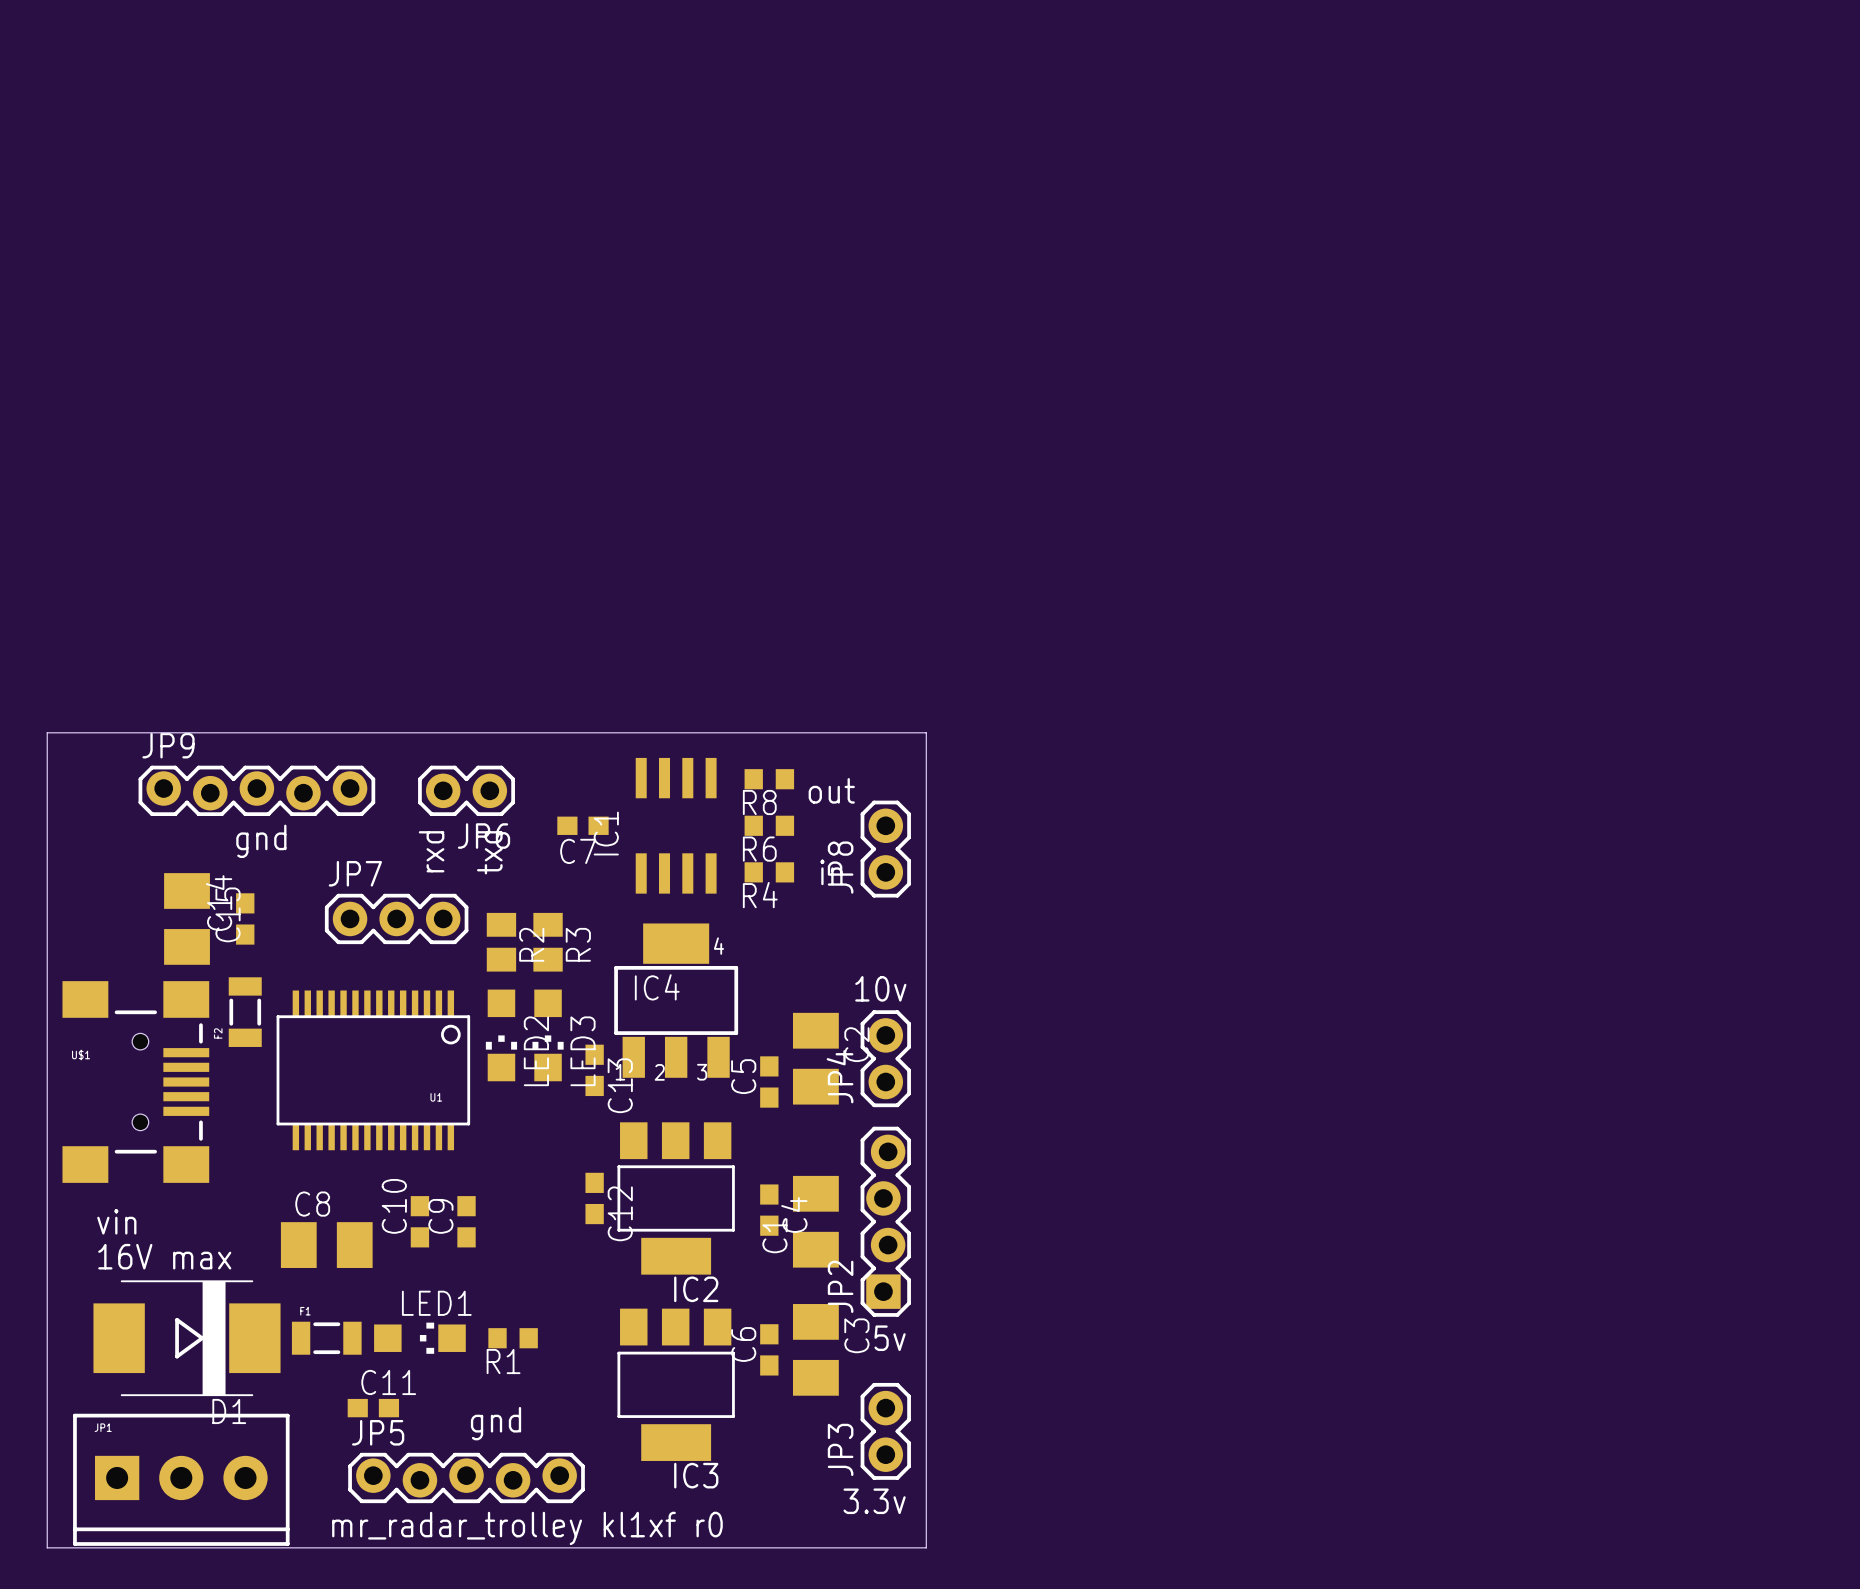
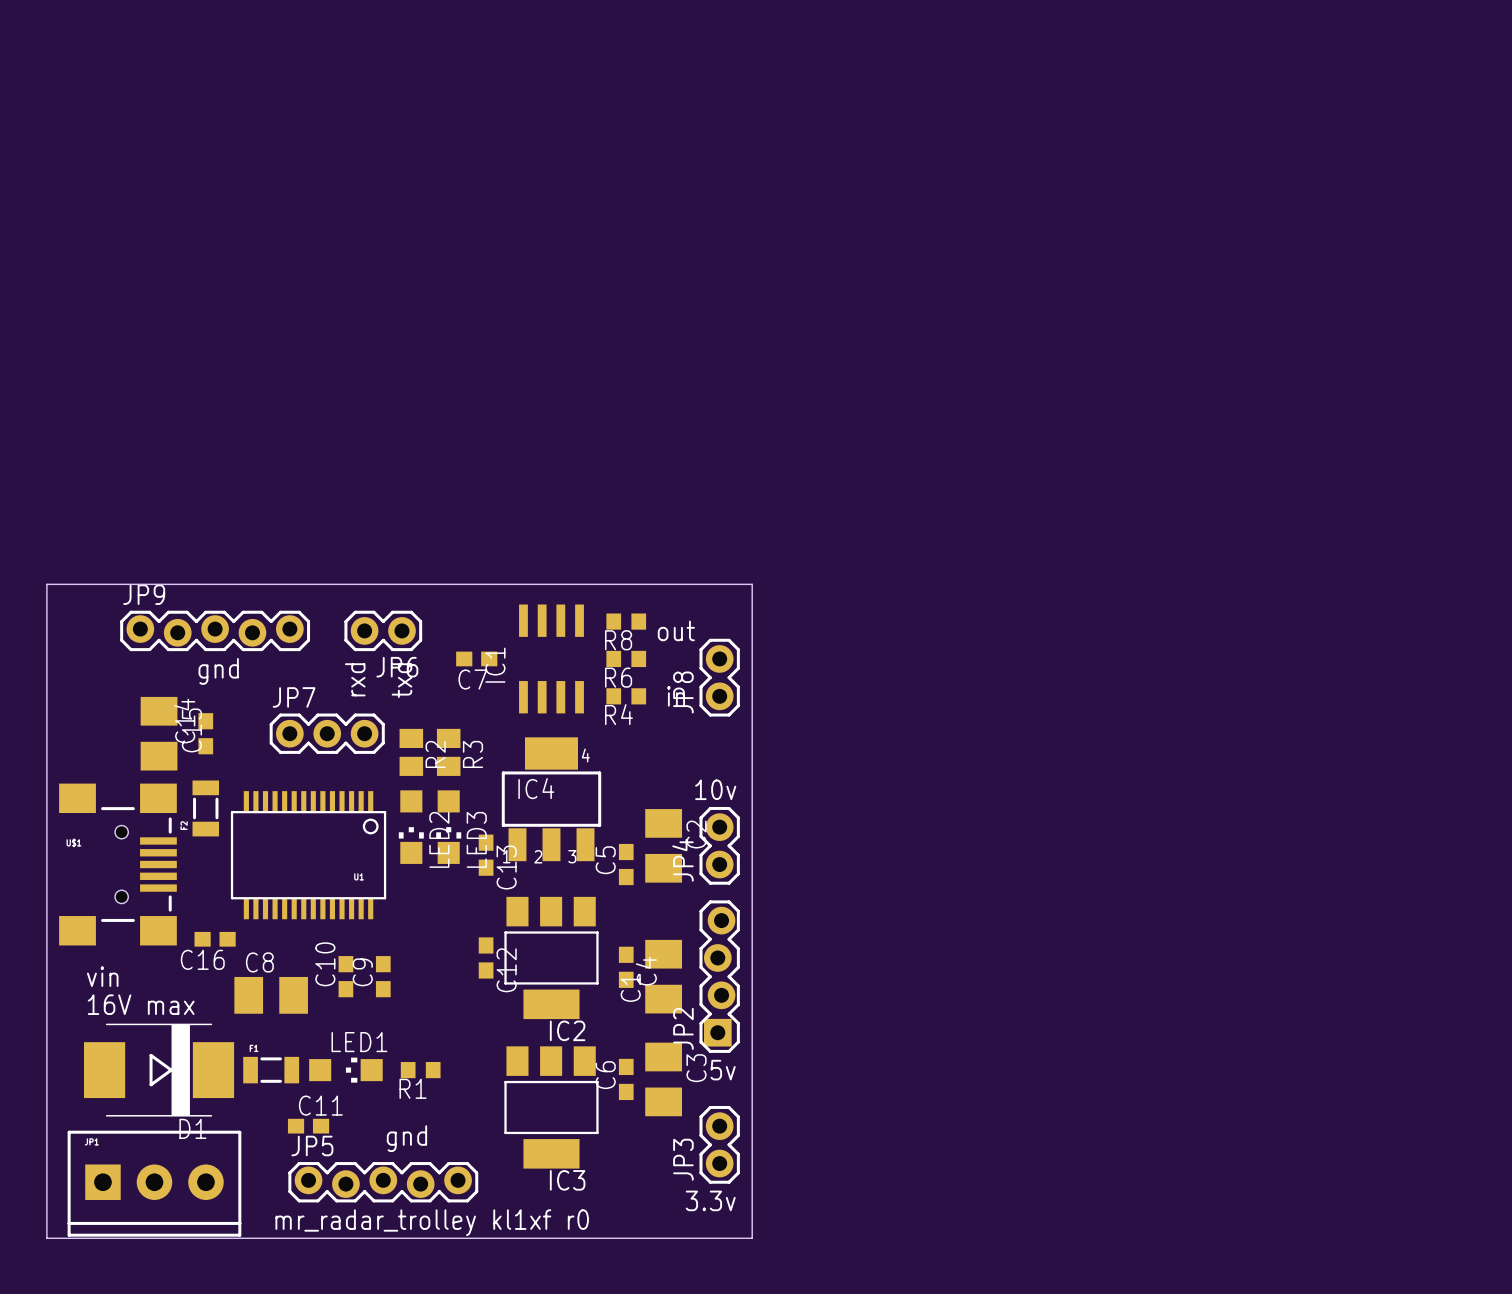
C16: none -> (215, 939)

